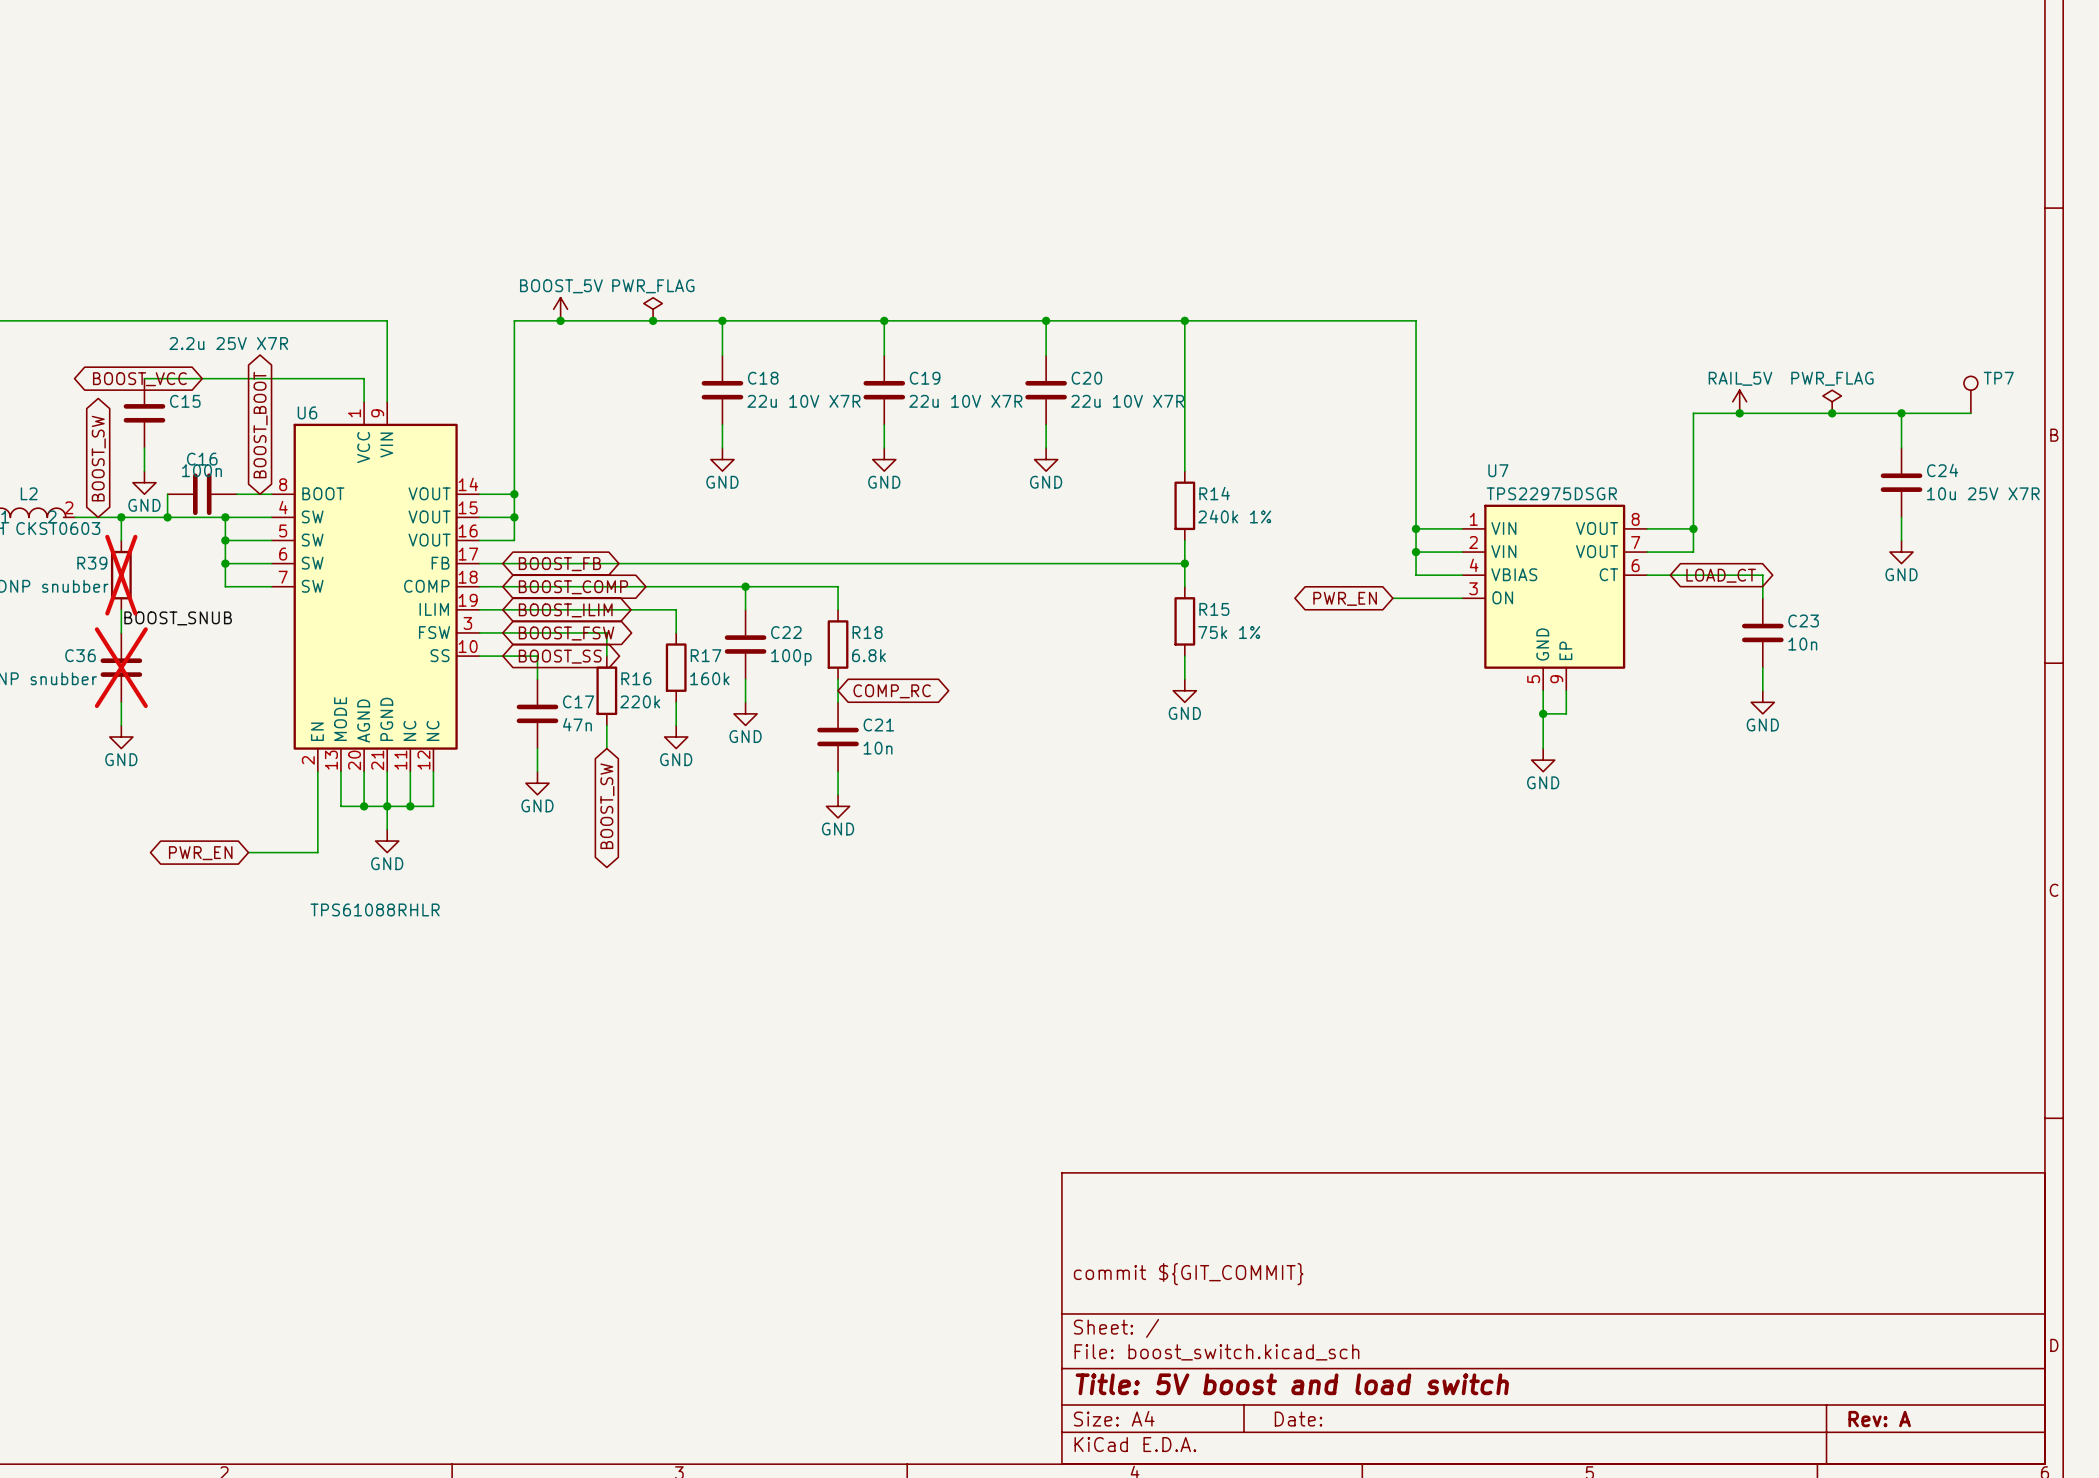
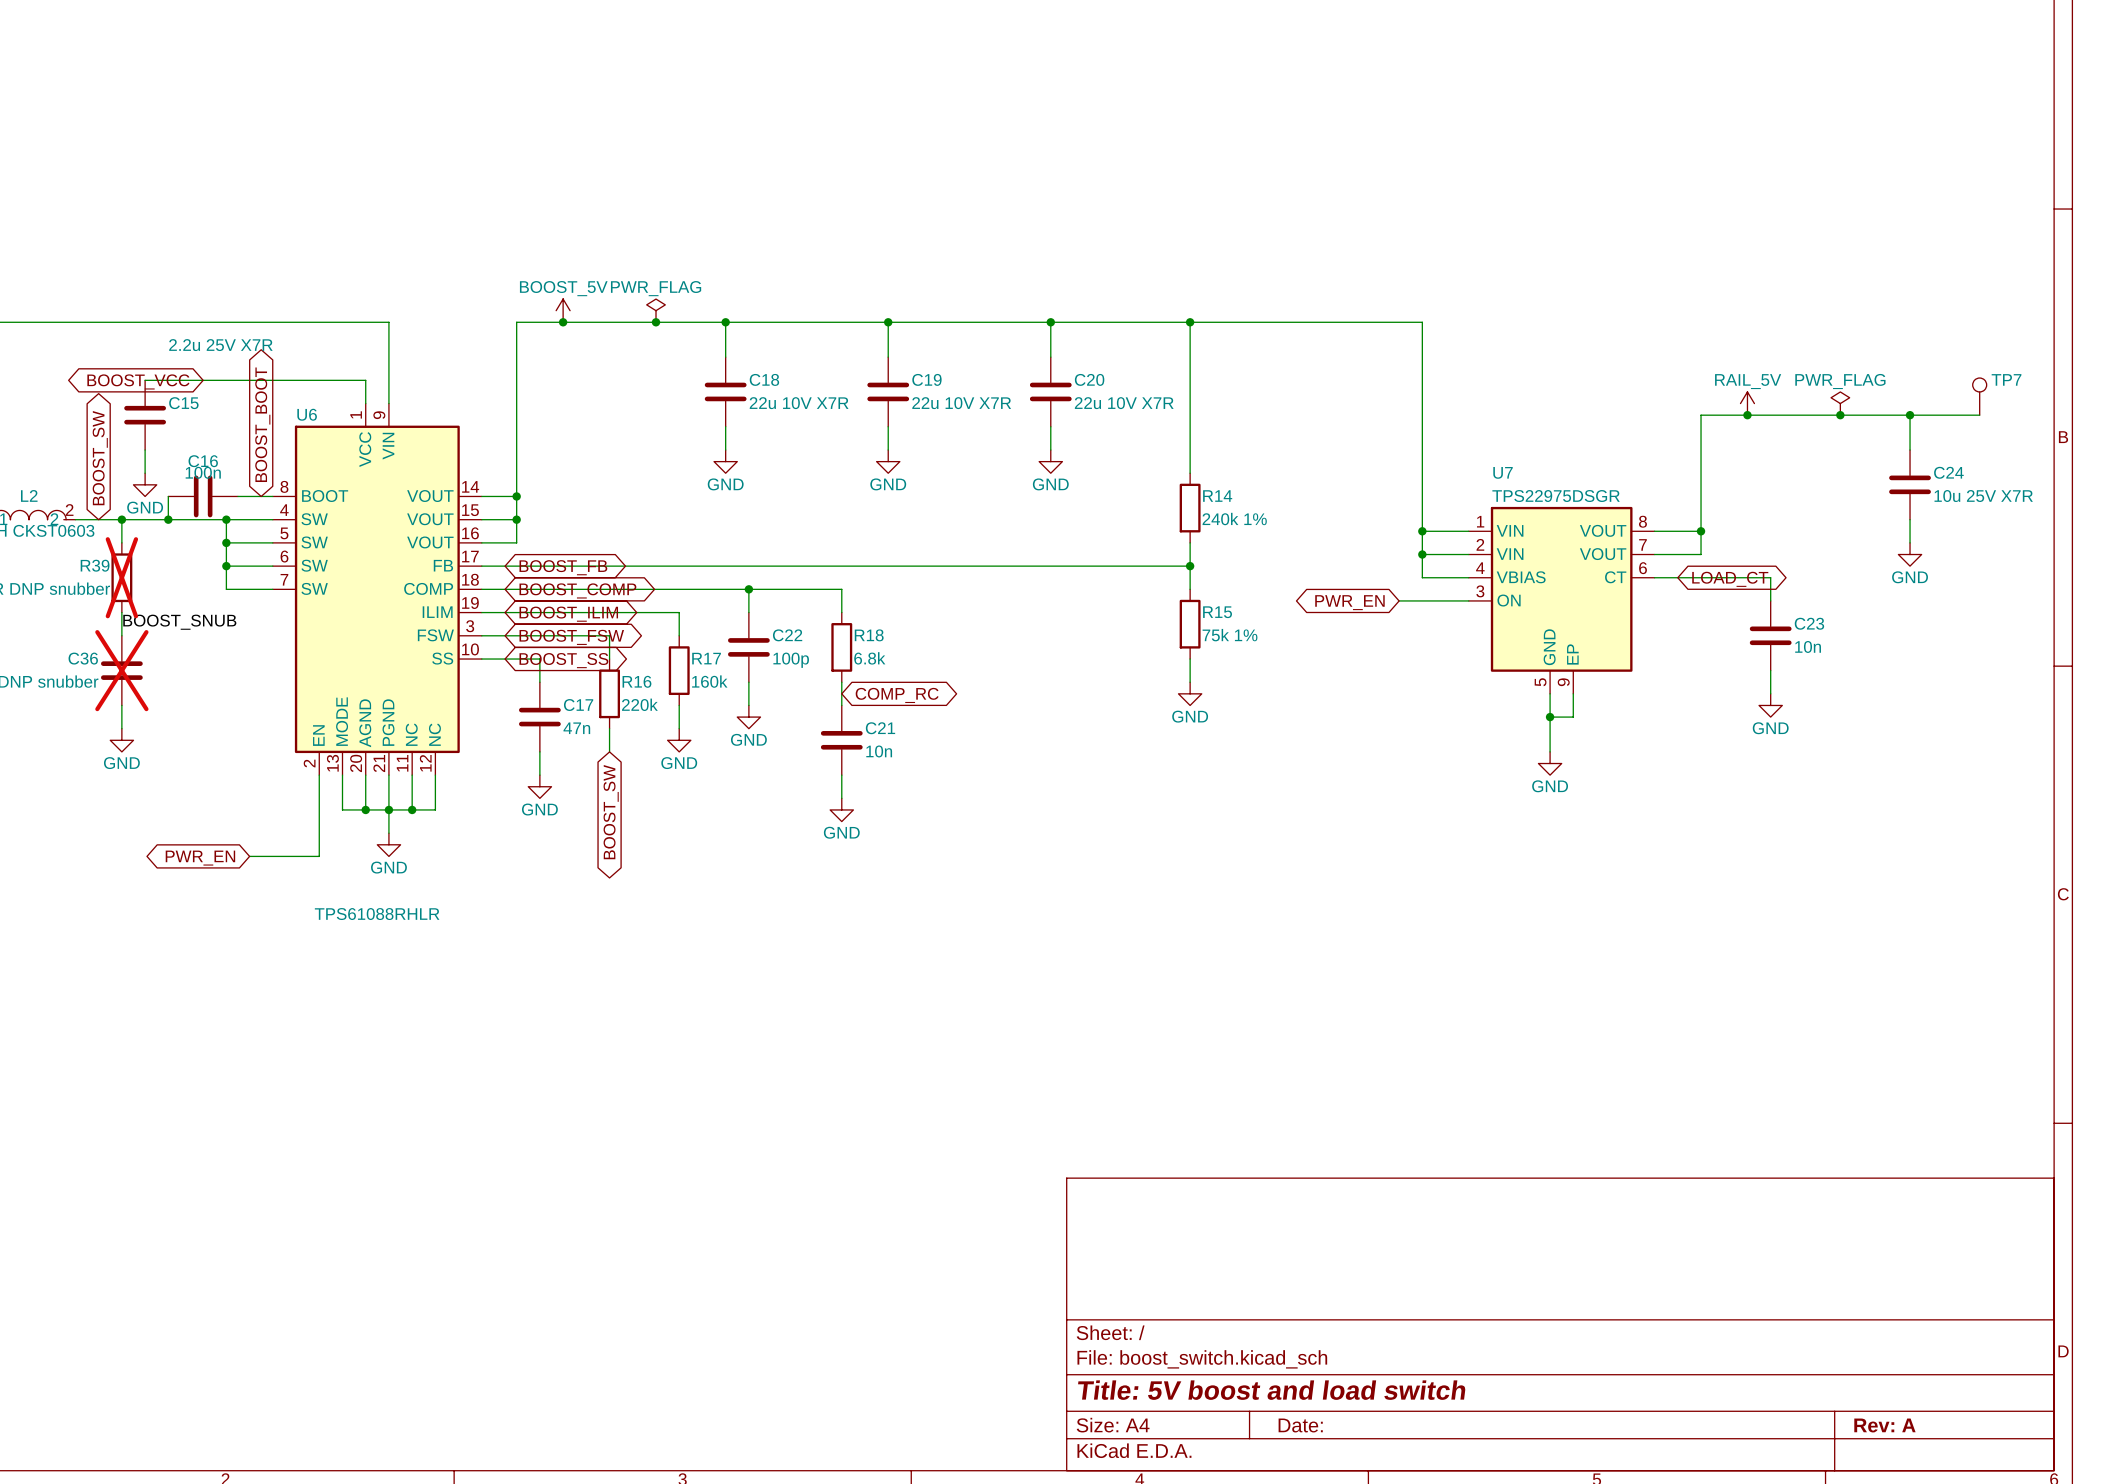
title block: commit ${GIT_COMMIT} (1188, 1274) -> none

